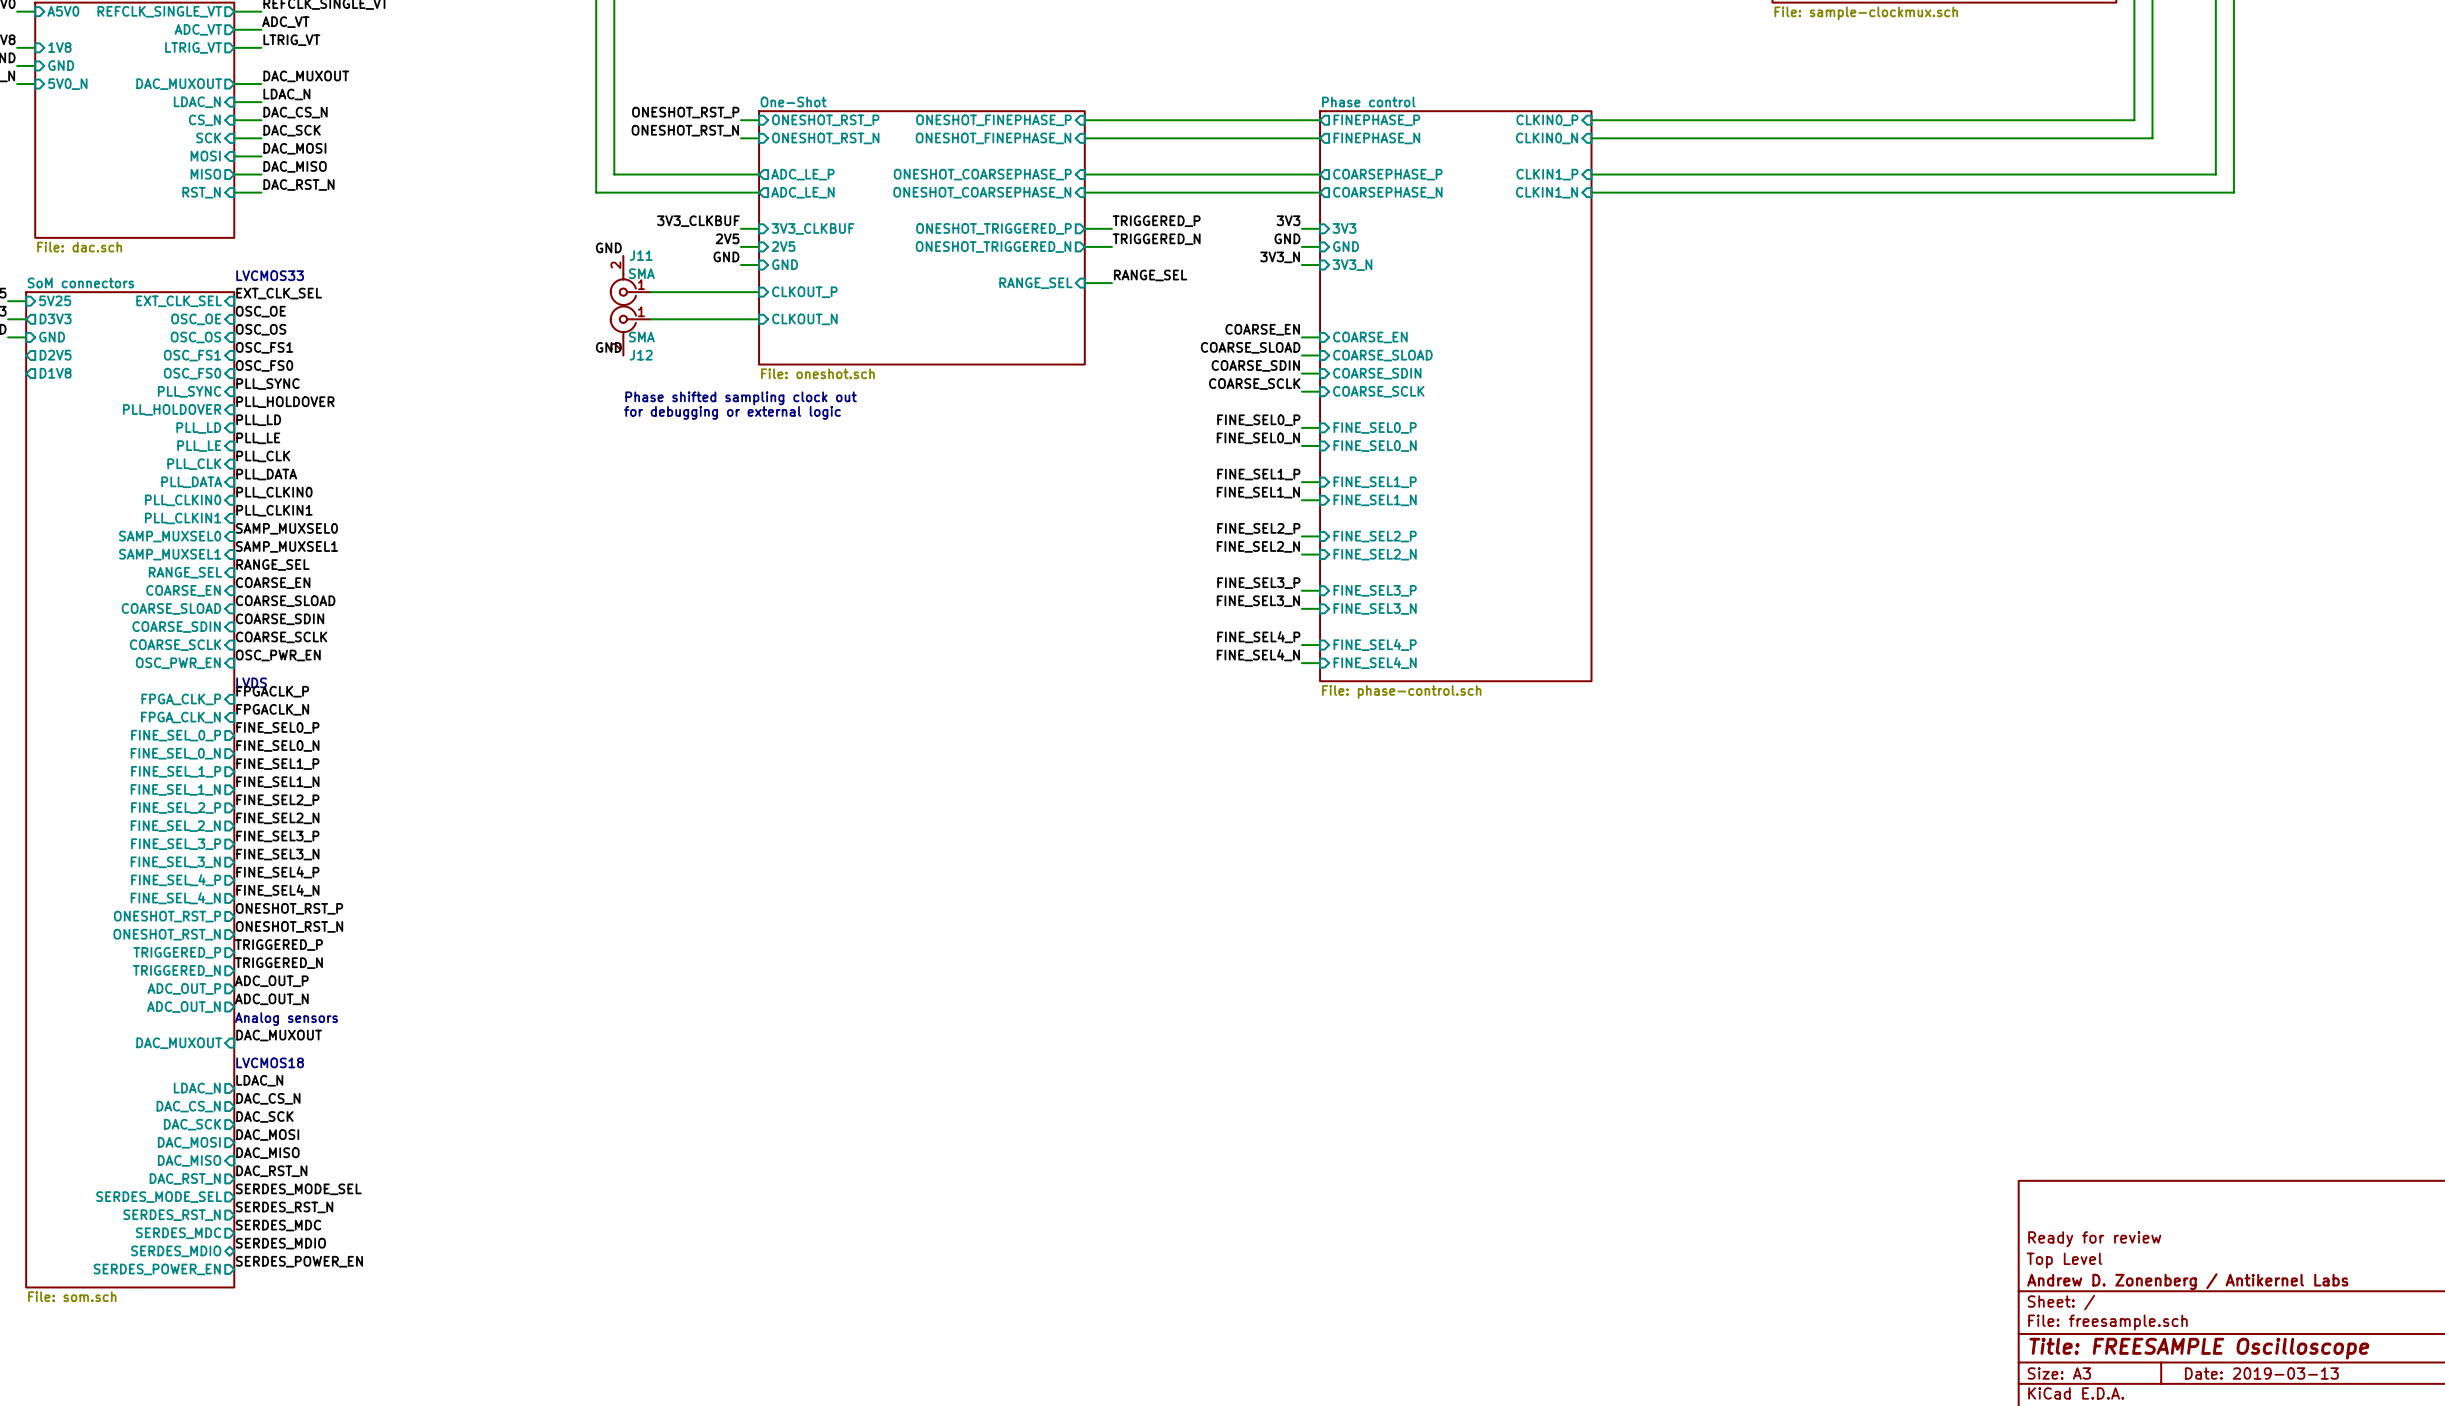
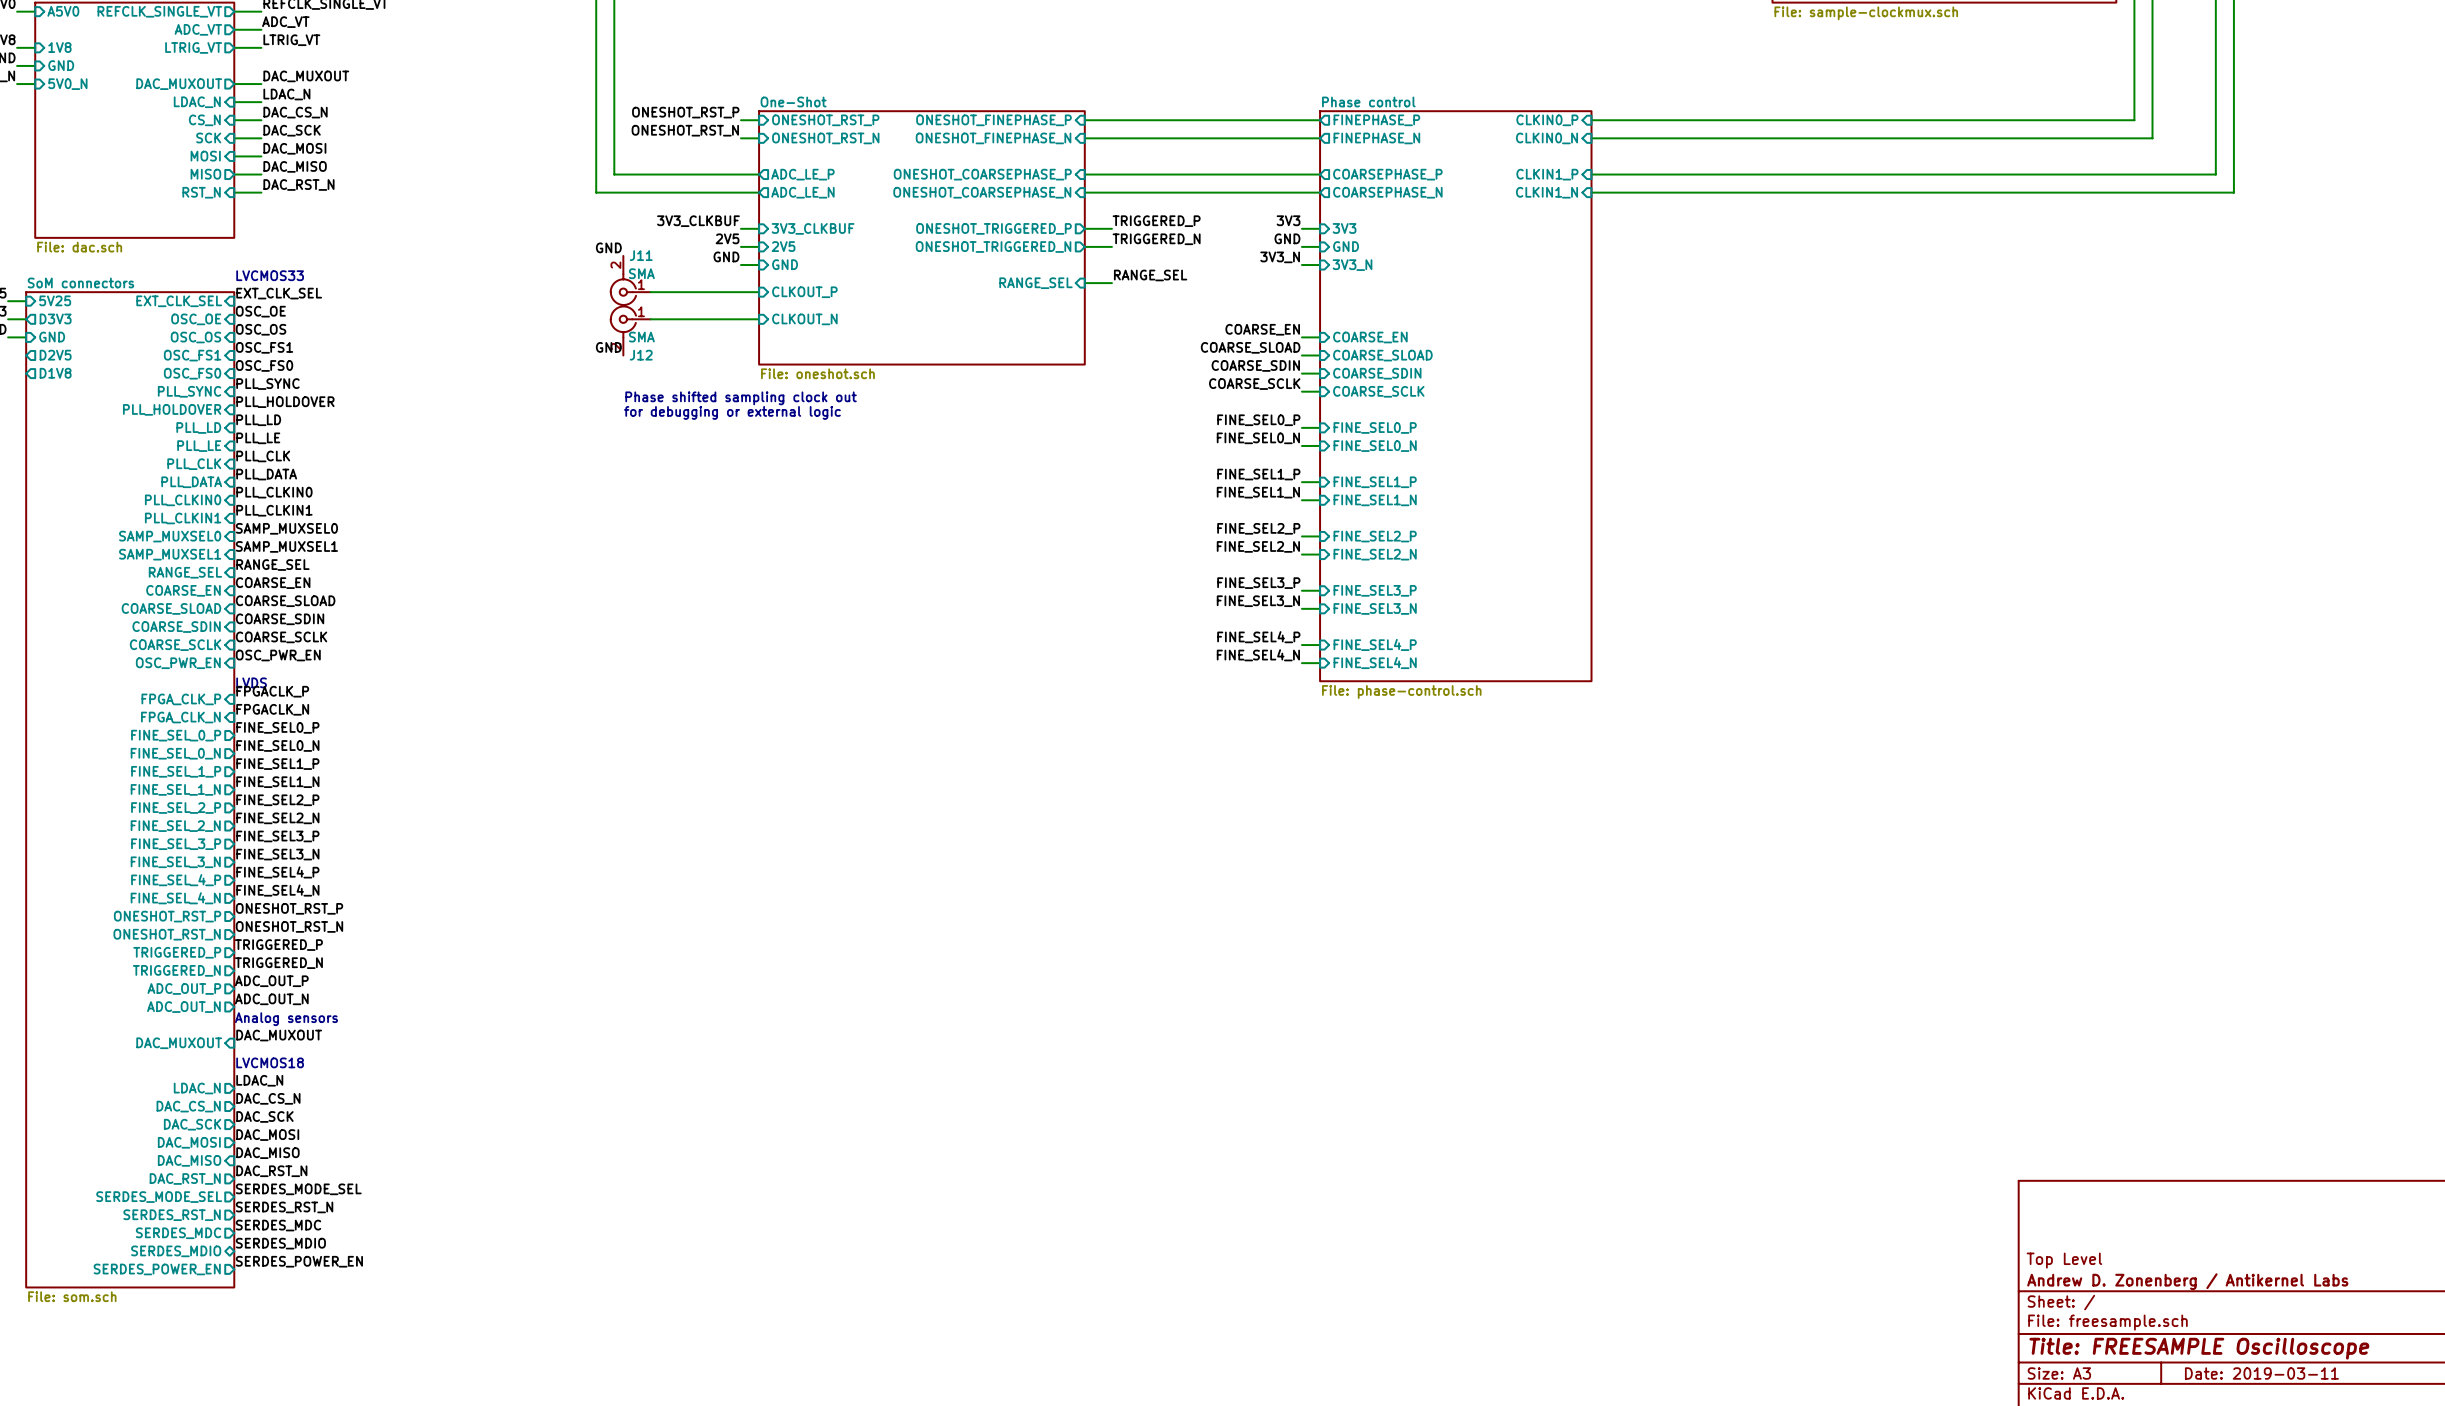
title block: Ready for review (2094, 1239) -> none
title block: Date: 2019-03-13 (2261, 1373) -> Date: 2019-03-11 (2261, 1373)

